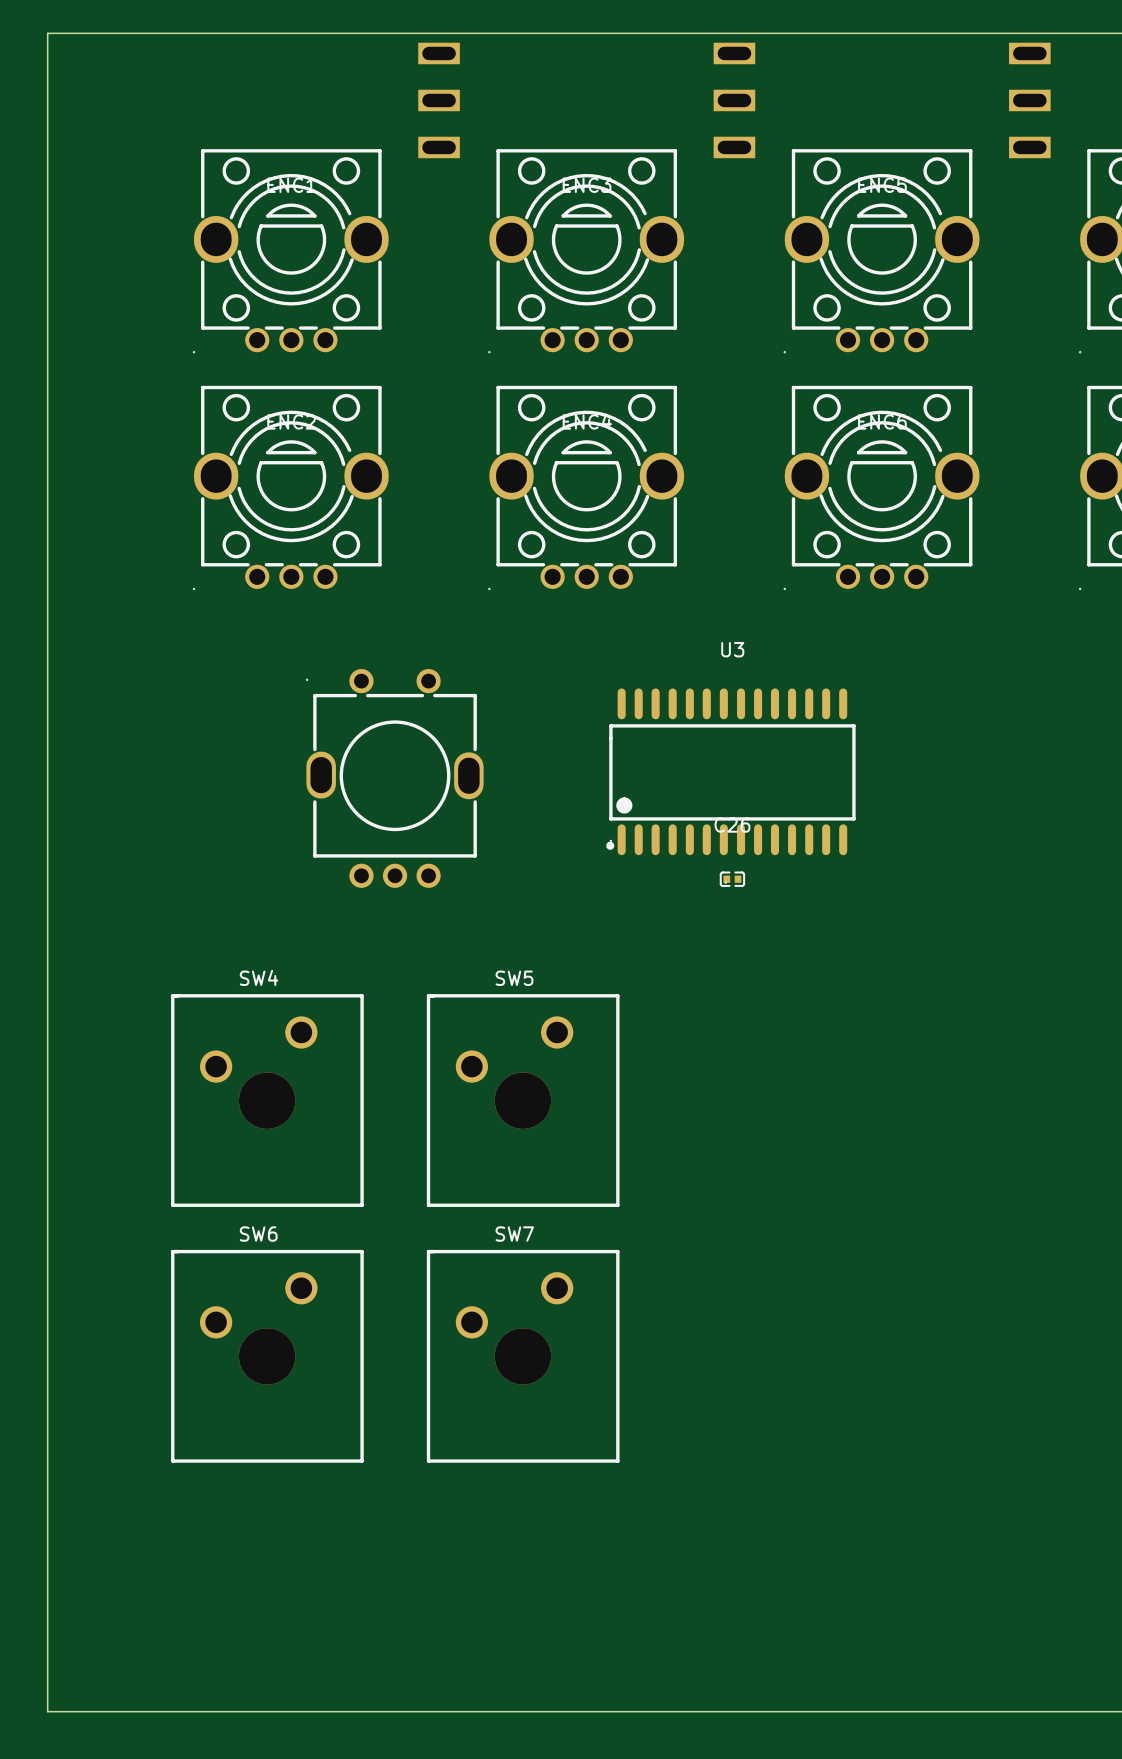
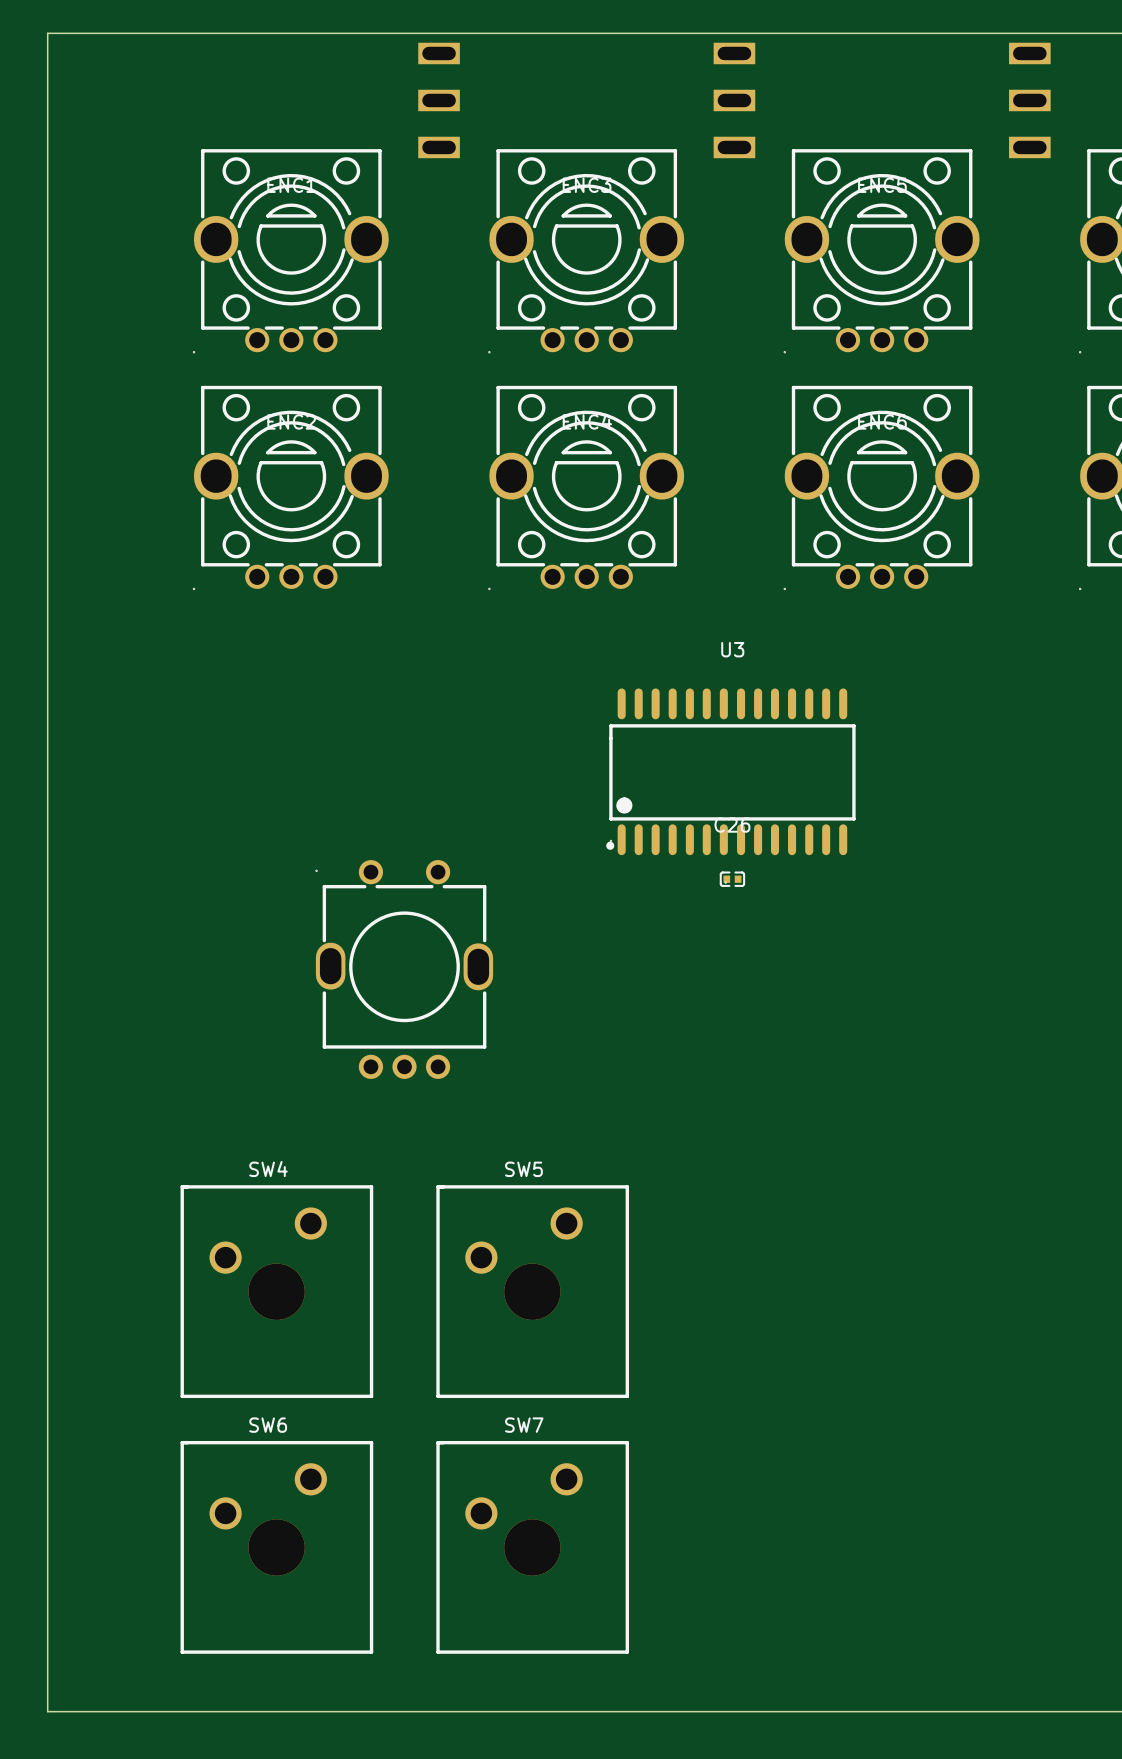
part position: (394, 778) -> (404, 969)
SW4 position: (267, 1100) -> (276, 1291)
SW5 position: (523, 1100) -> (532, 1291)
SW6 position: (267, 1356) -> (276, 1547)
SW7 position: (523, 1356) -> (532, 1547)

